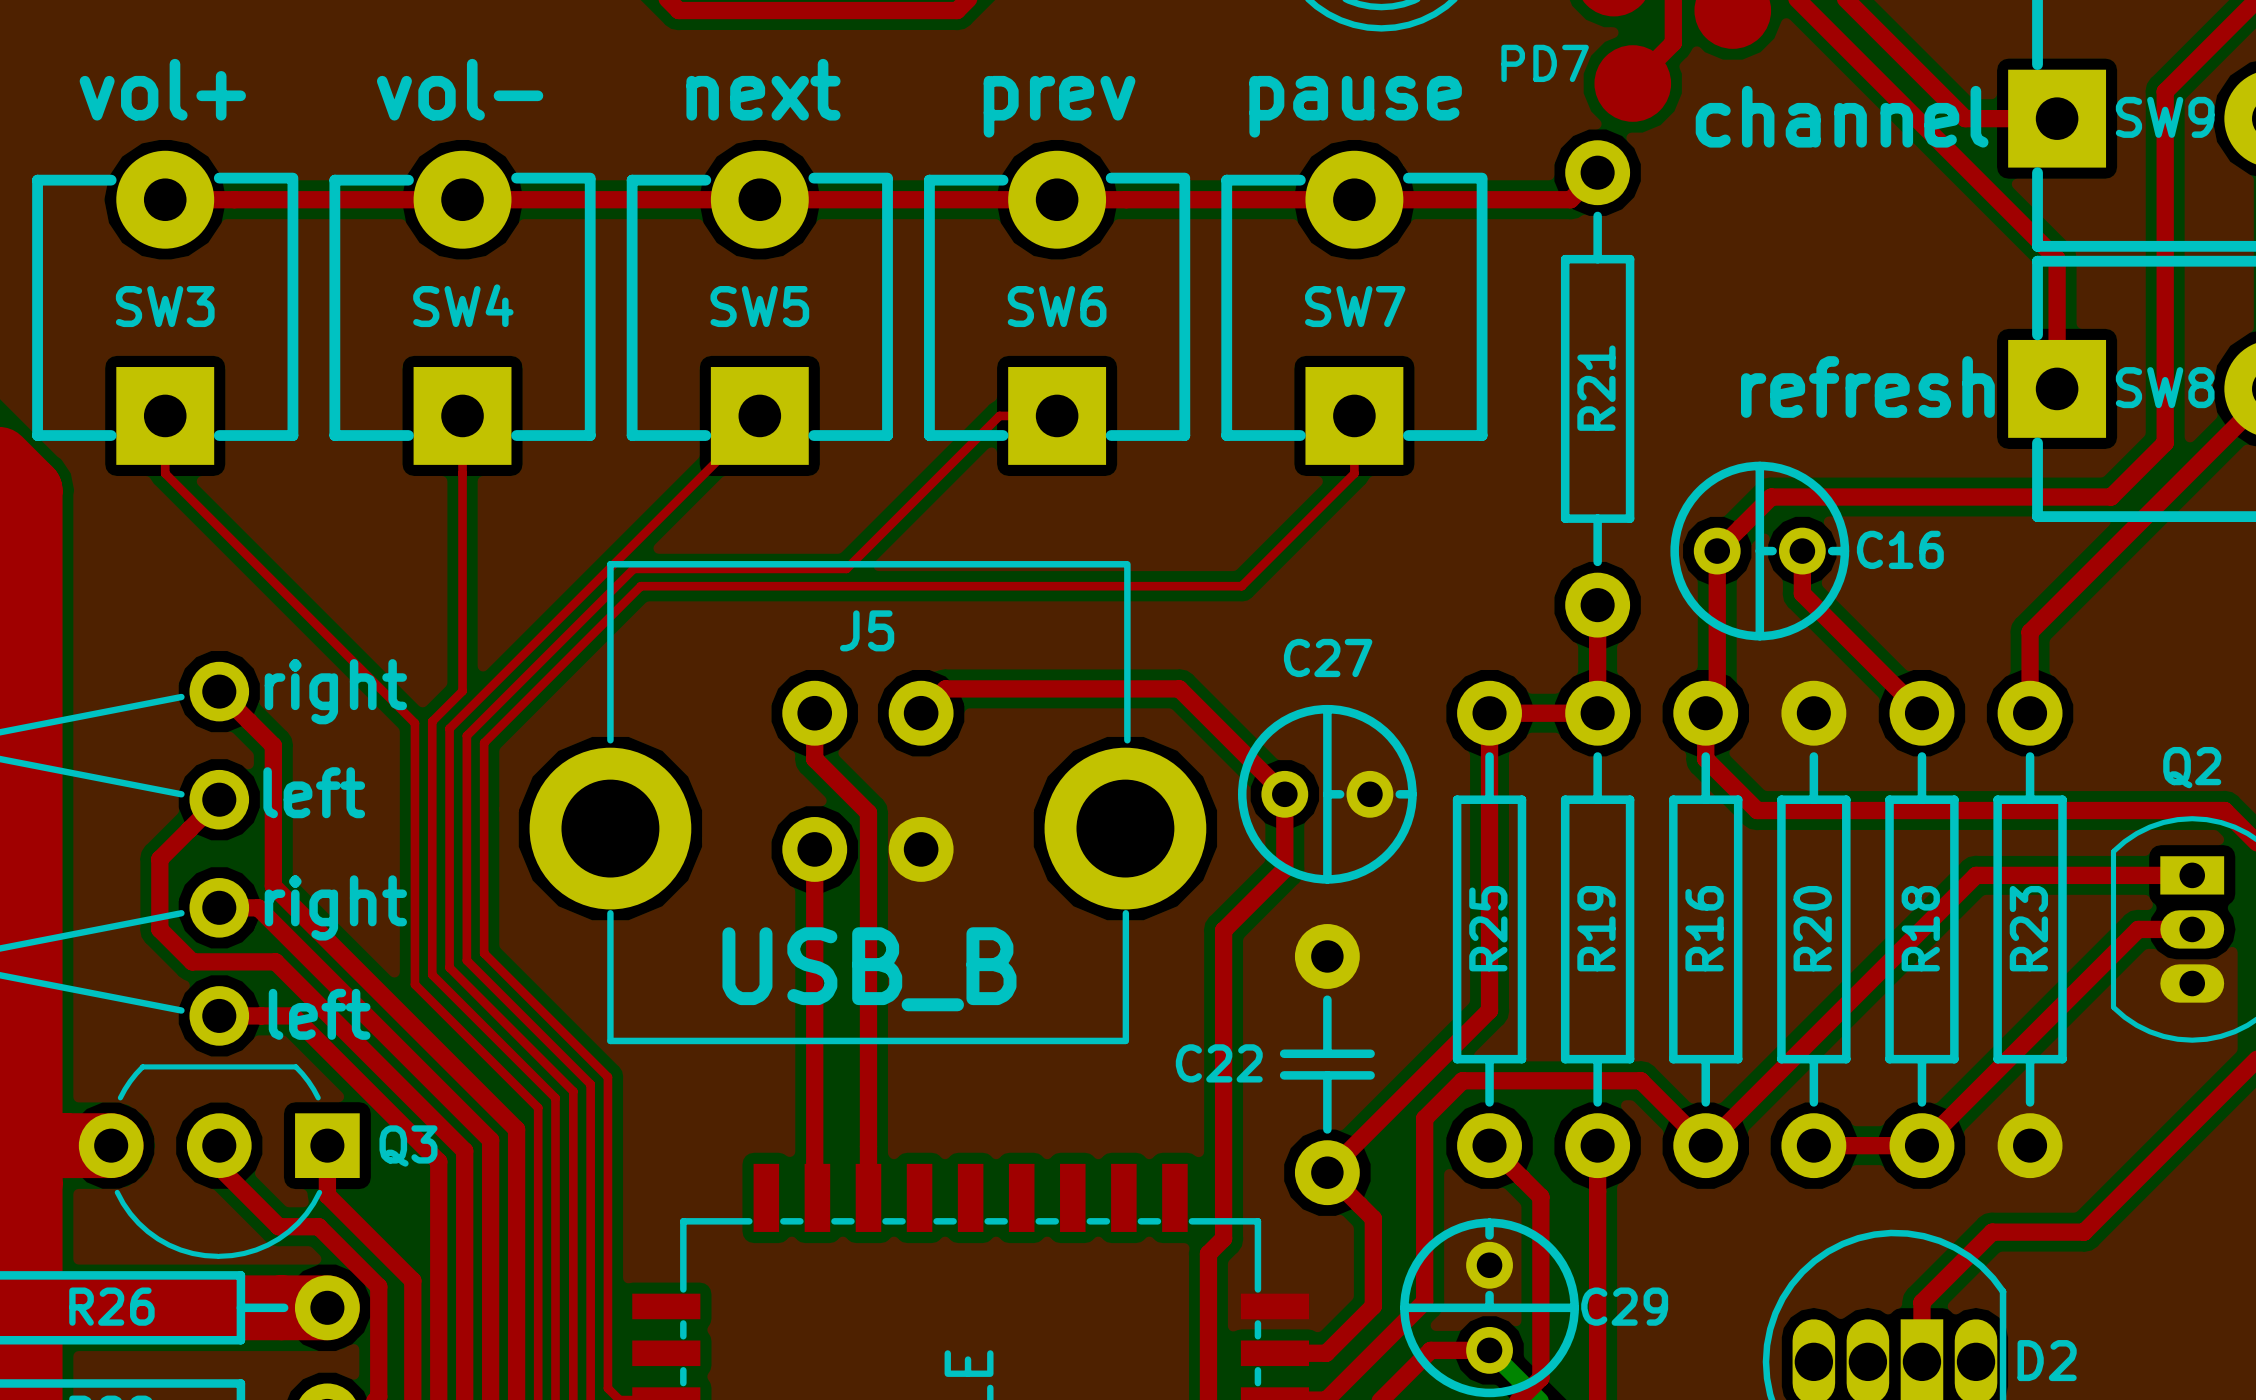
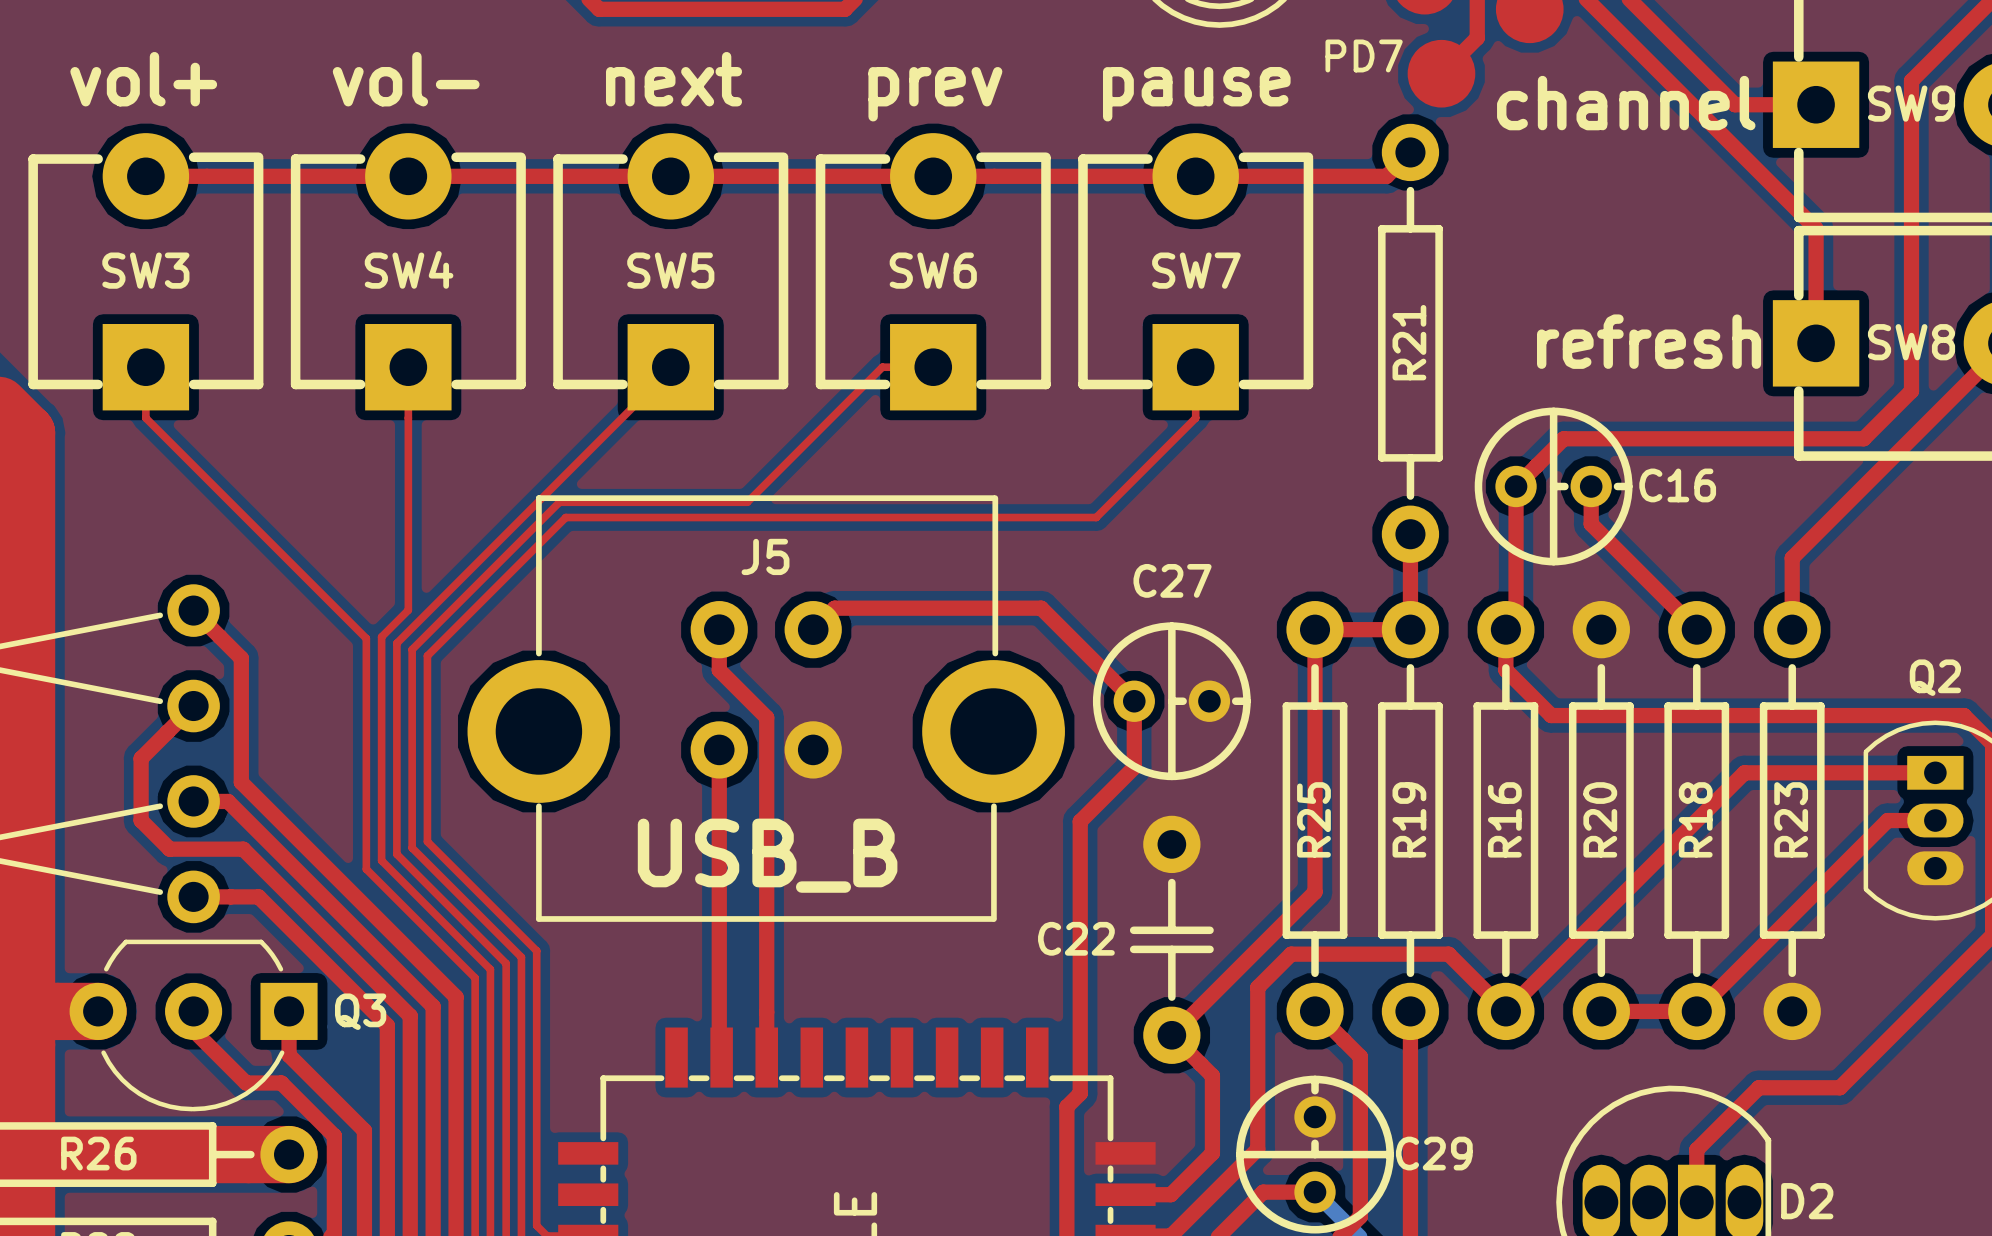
text: right (335, 691) -> none
text: left (314, 792) -> none
text: right (335, 907) -> none
text: left (319, 1014) -> none

